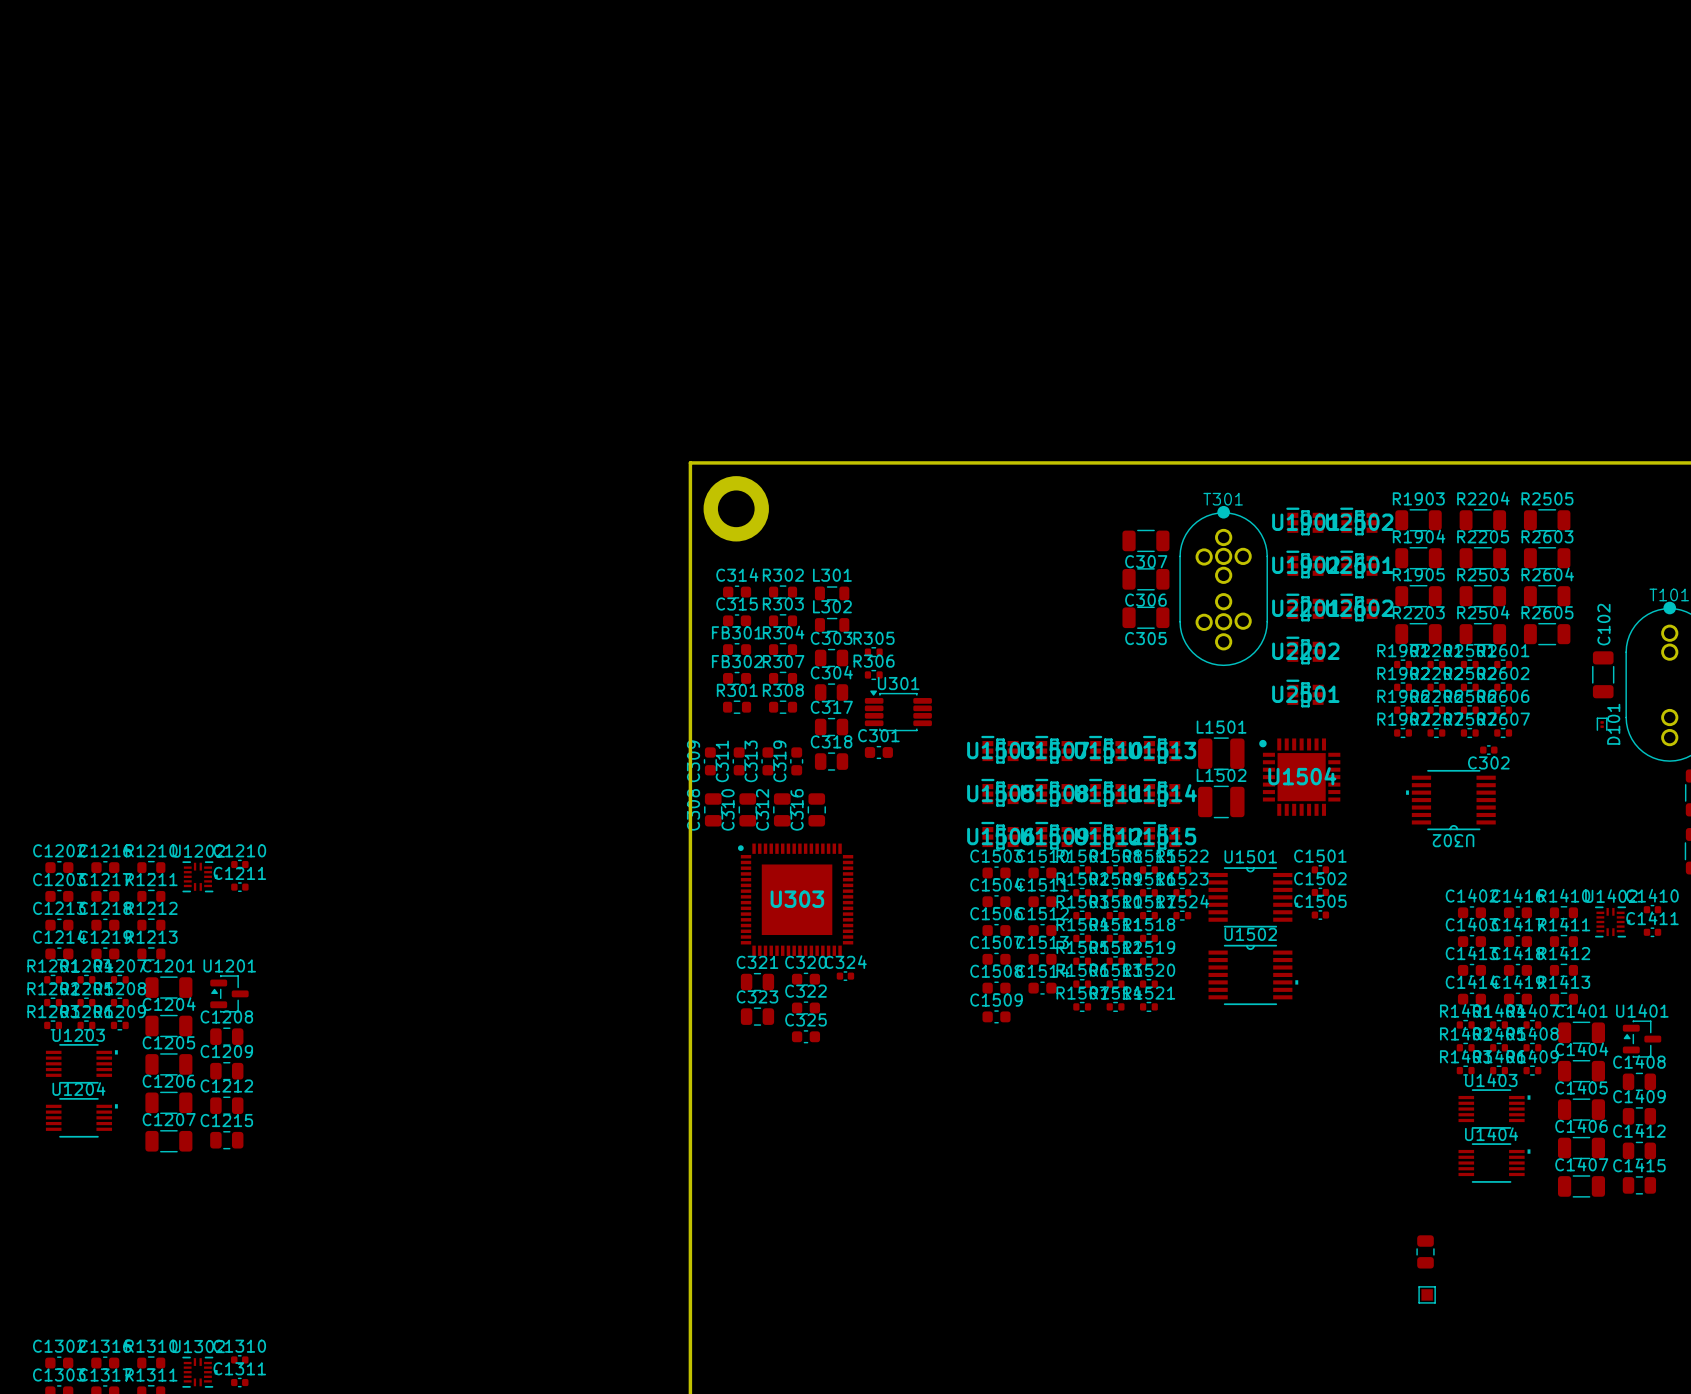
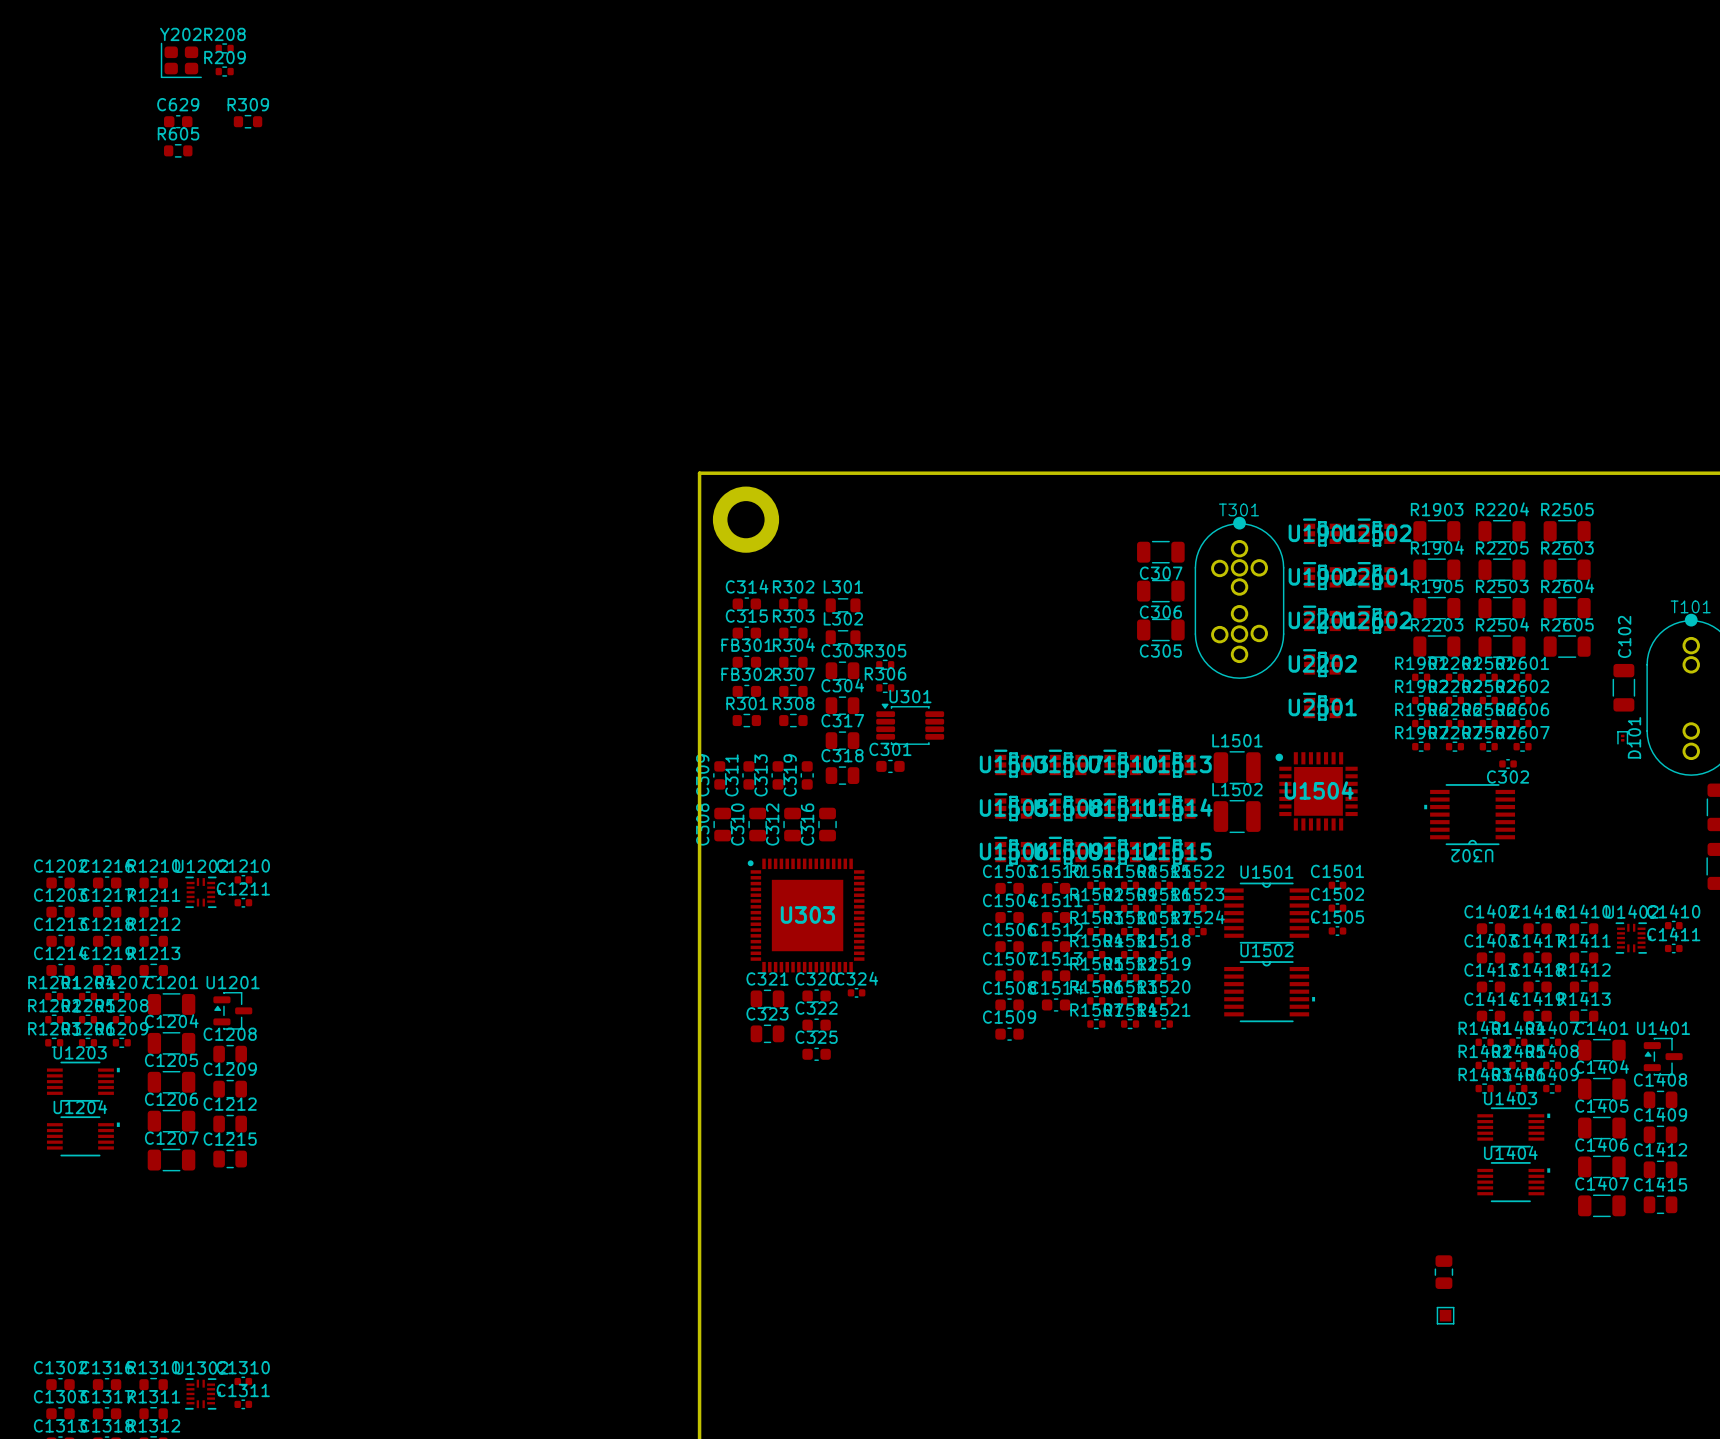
R208: none -> (224, 48)
Y202: none -> (181, 60)
R209: none -> (224, 71)
C629: none -> (178, 121)
R309: none -> (248, 121)
R605: none -> (178, 150)

